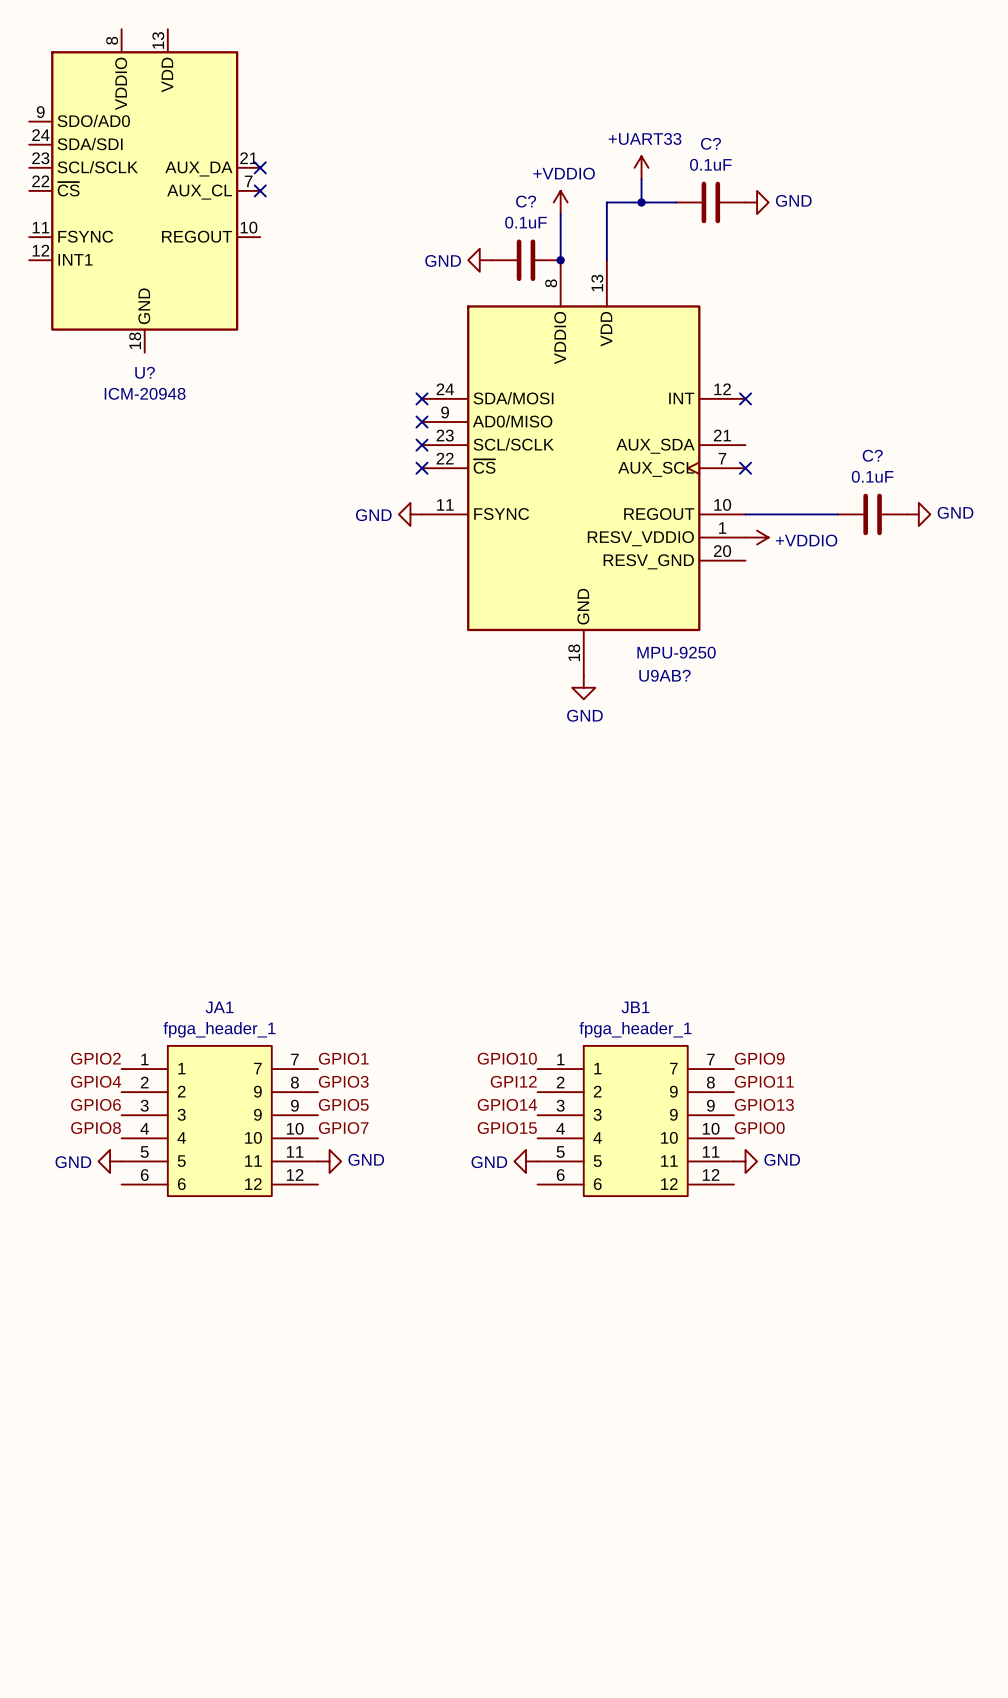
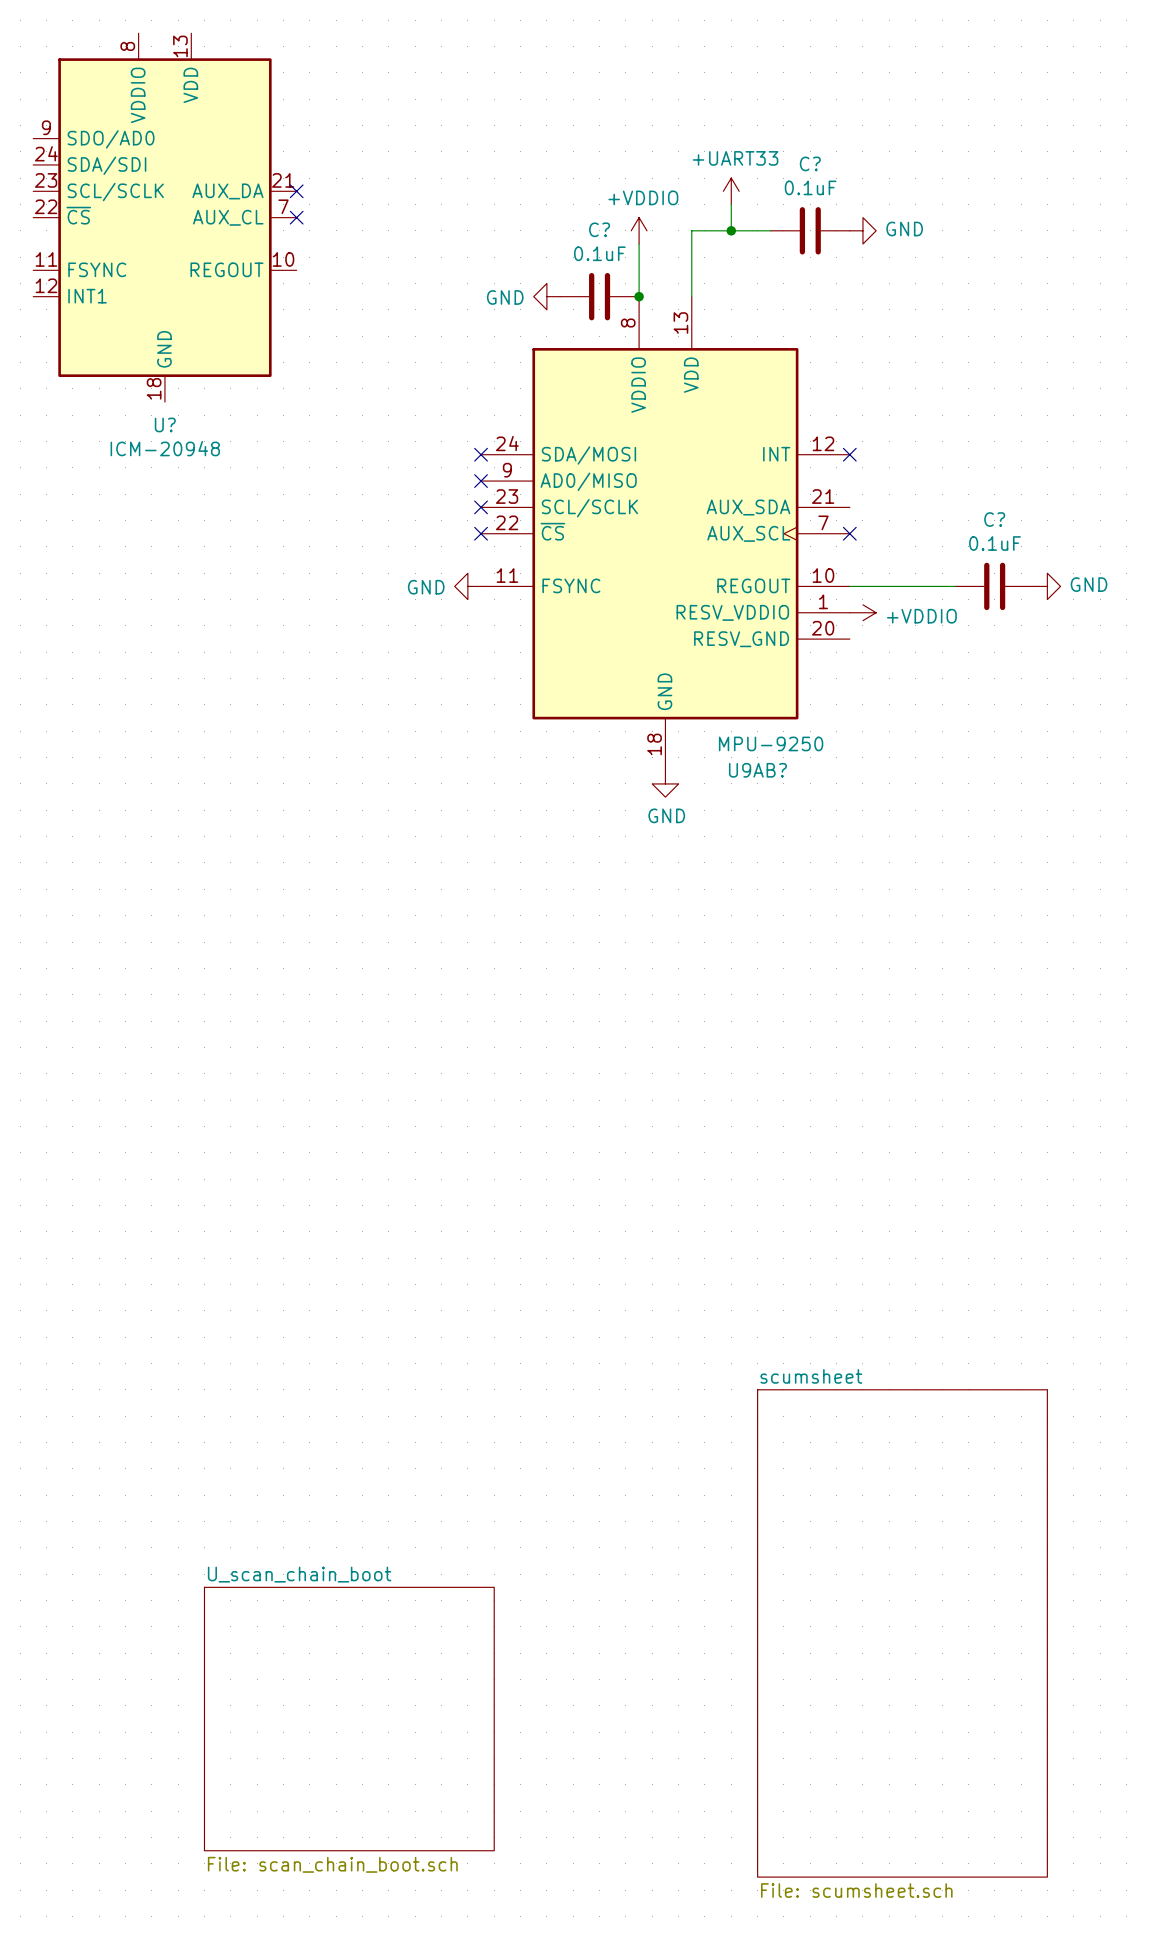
label: GPIO2 (95, 1058) -> none
label: GPIO1 (343, 1058) -> none
label: GPIO10 (507, 1058) -> none
label: GPIO9 (759, 1058) -> none
label: GPIO4 (96, 1081) -> none
label: GPIO3 (343, 1081) -> none
label: GPI12 (513, 1081) -> none
label: GPIO11 (764, 1081) -> none
label: GPIO6 (95, 1104) -> none
label: GPIO5 (343, 1104) -> none
label: GPIO14 (507, 1104) -> none
label: GPIO13 (764, 1104) -> none
JA1: fpga_header_1 (219, 1121) -> none
JB1: fpga_header_1 (635, 1121) -> none
label: GPIO8 (96, 1128) -> none
label: GPIO7 (343, 1128) -> none
label: GPIO15 (507, 1128) -> none
label: GPIO0 (759, 1128) -> none
power symbol: GND (110, 1161) -> none
power symbol: GND (329, 1161) -> none
power symbol: GND (525, 1161) -> none
power symbol: GND (745, 1161) -> none
sheet scumsheet: none -> File: scumsheet.sch (902, 1633)
sheet U_scan_chain_boot: none -> File: scan_chain_boot.sch (349, 1719)

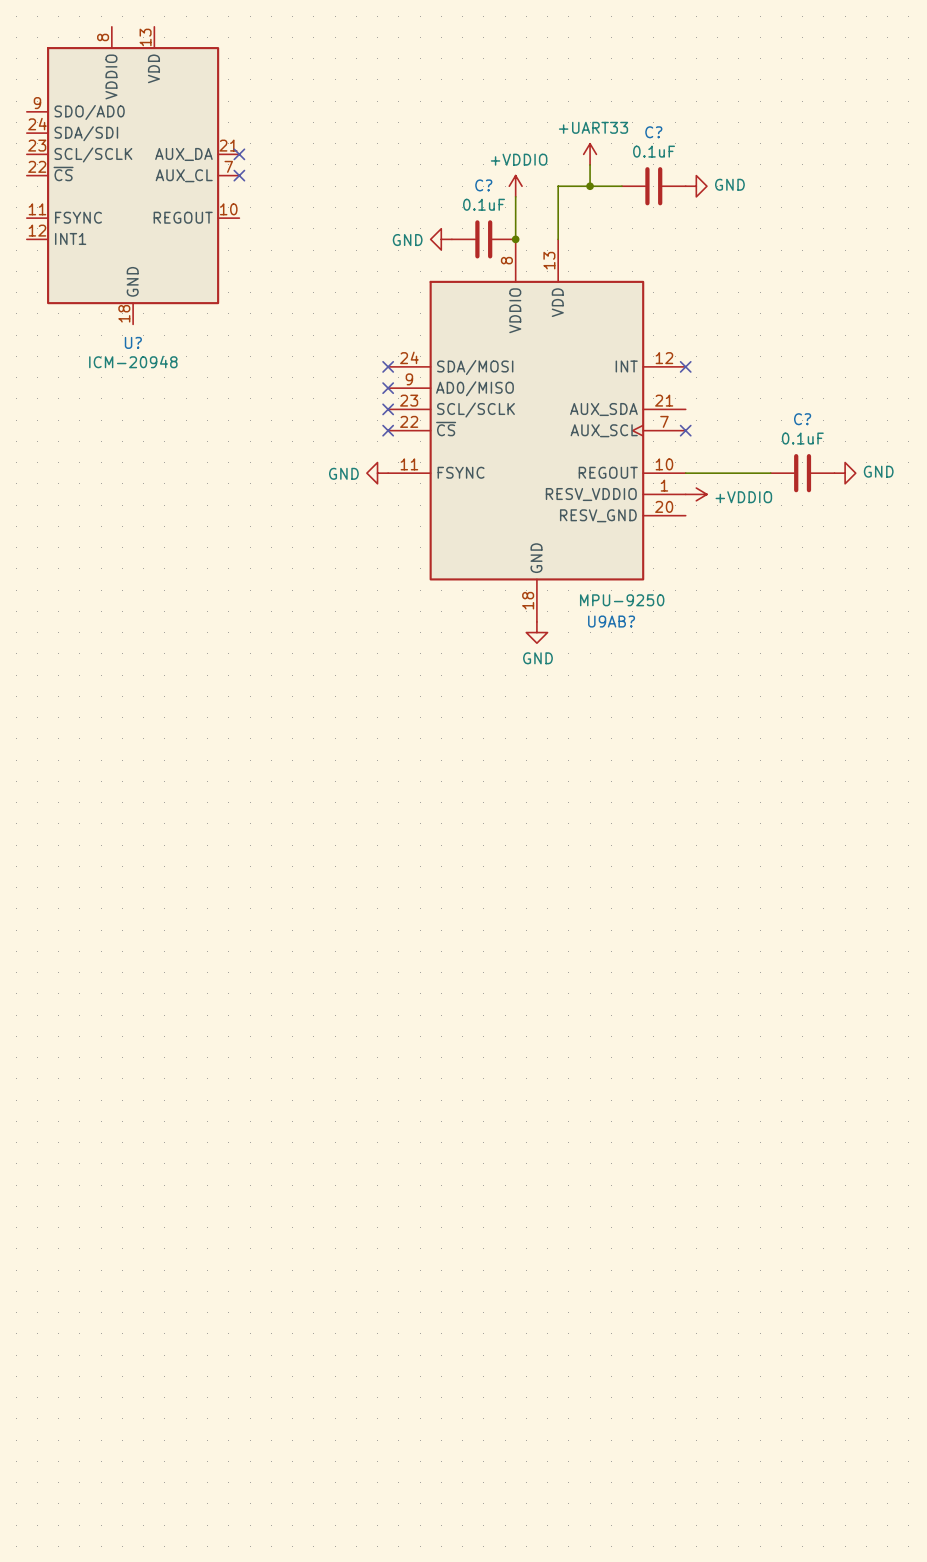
sheet scumsheet: File: scumsheet.sch (902, 1633) -> none
sheet U_scan_chain_boot: File: scan_chain_boot.sch (349, 1719) -> none

